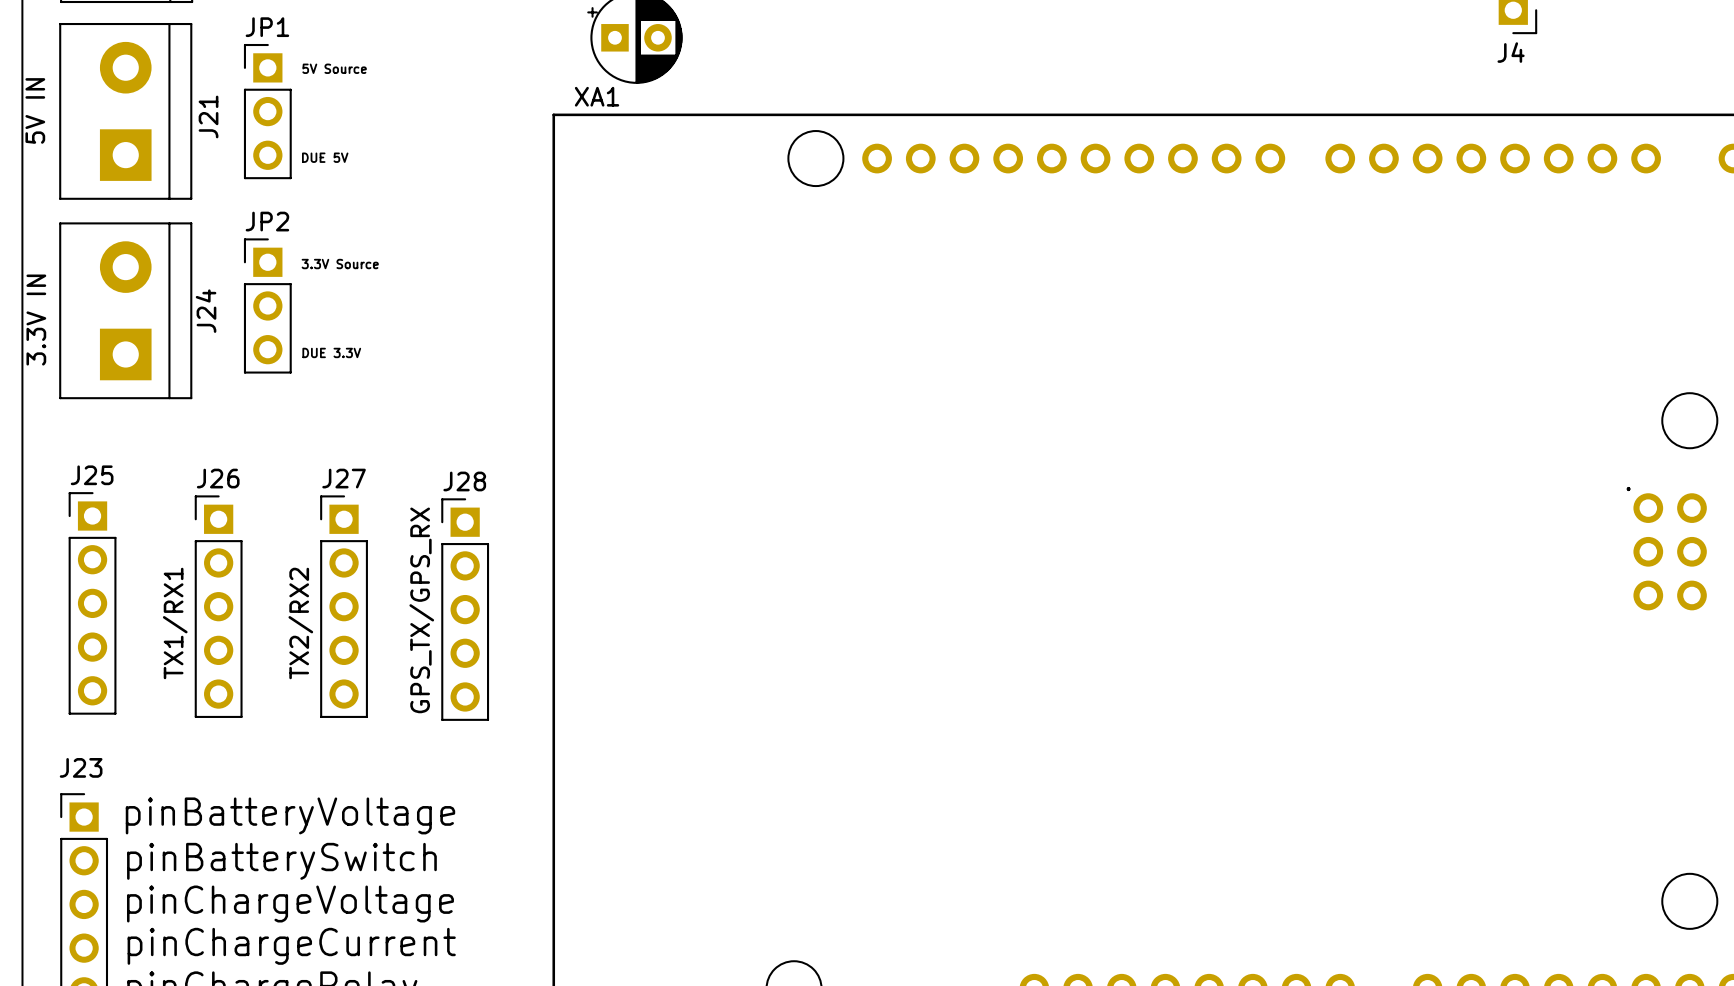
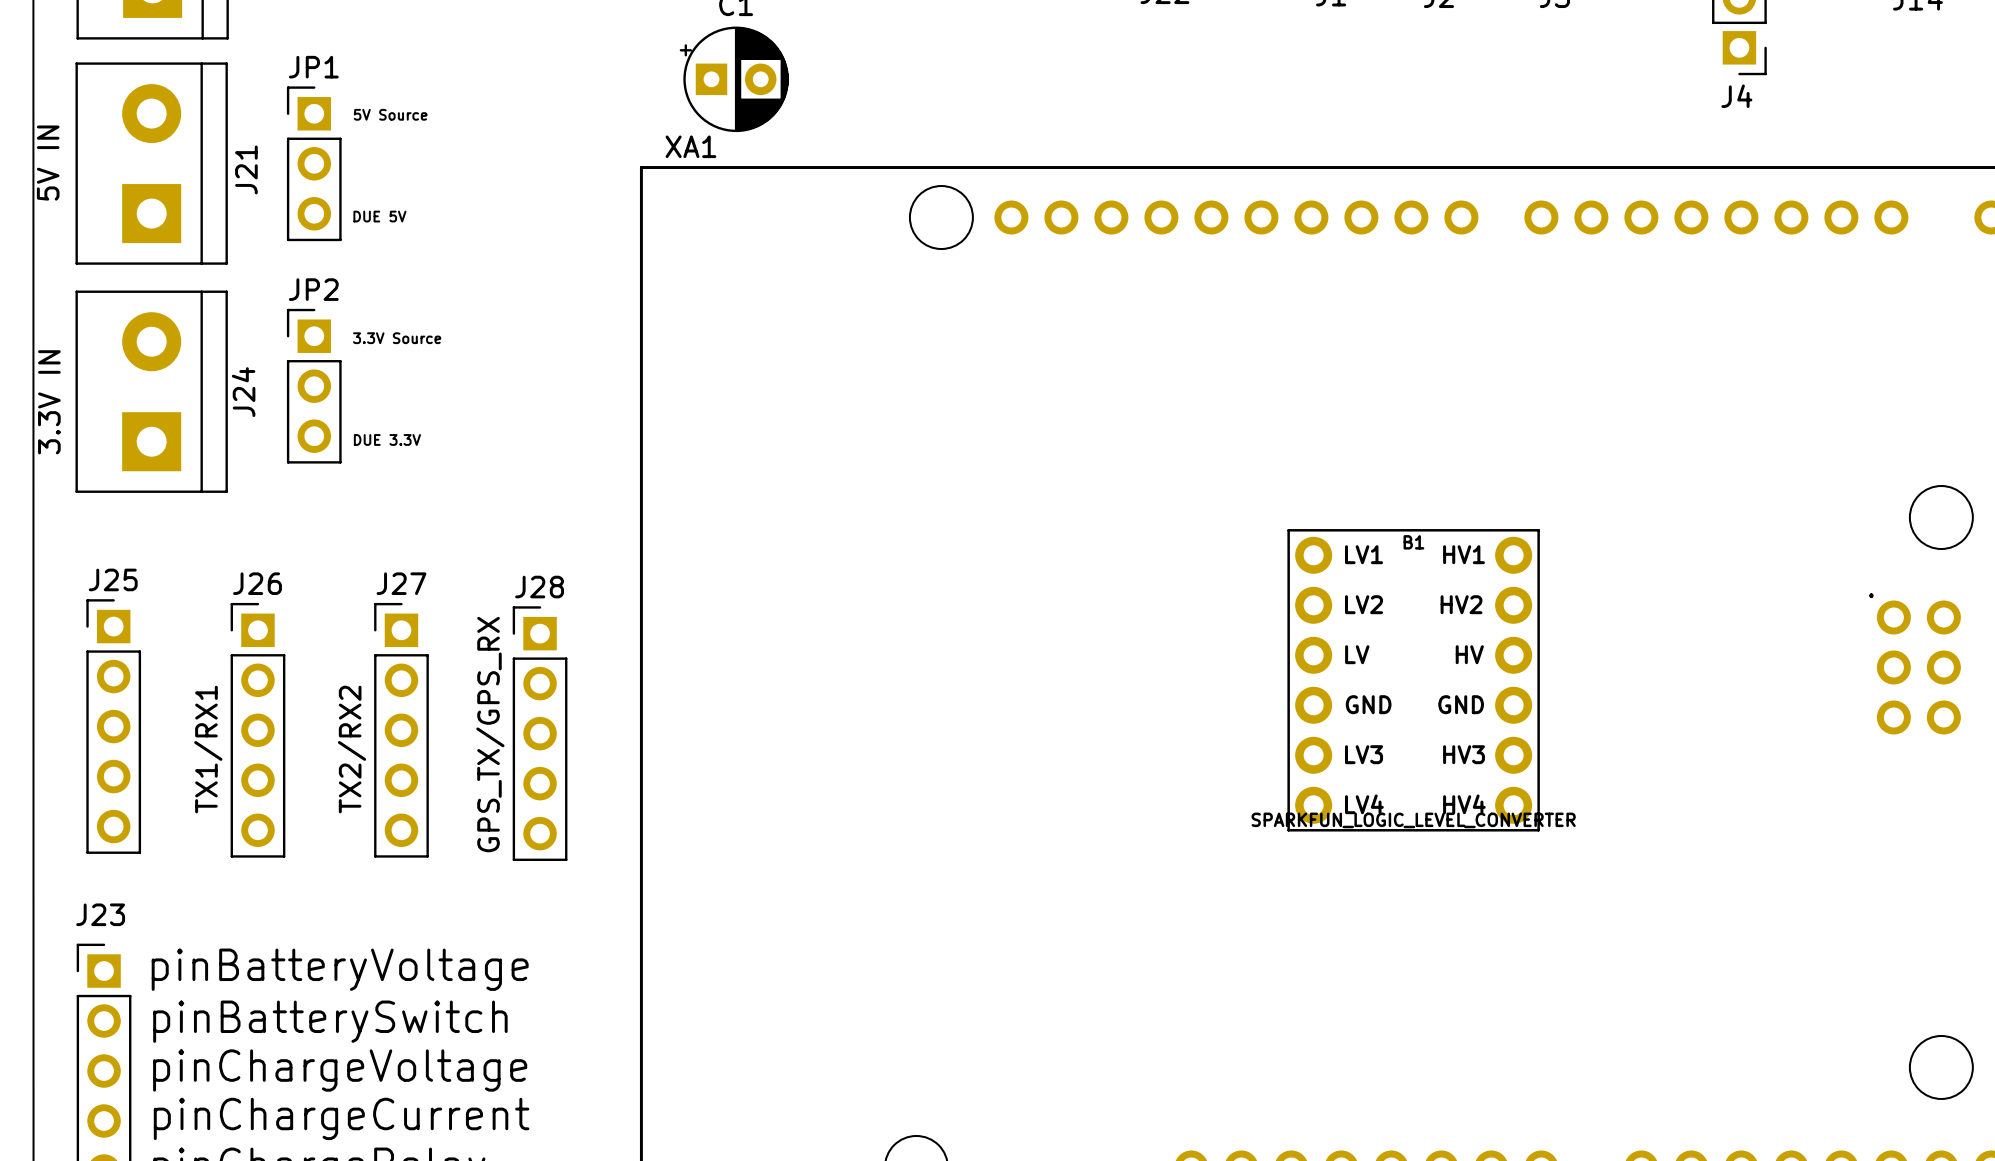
B1: none -> SPARKFUN_LOGIC_LEVEL_CONVERTER (1413, 680)

